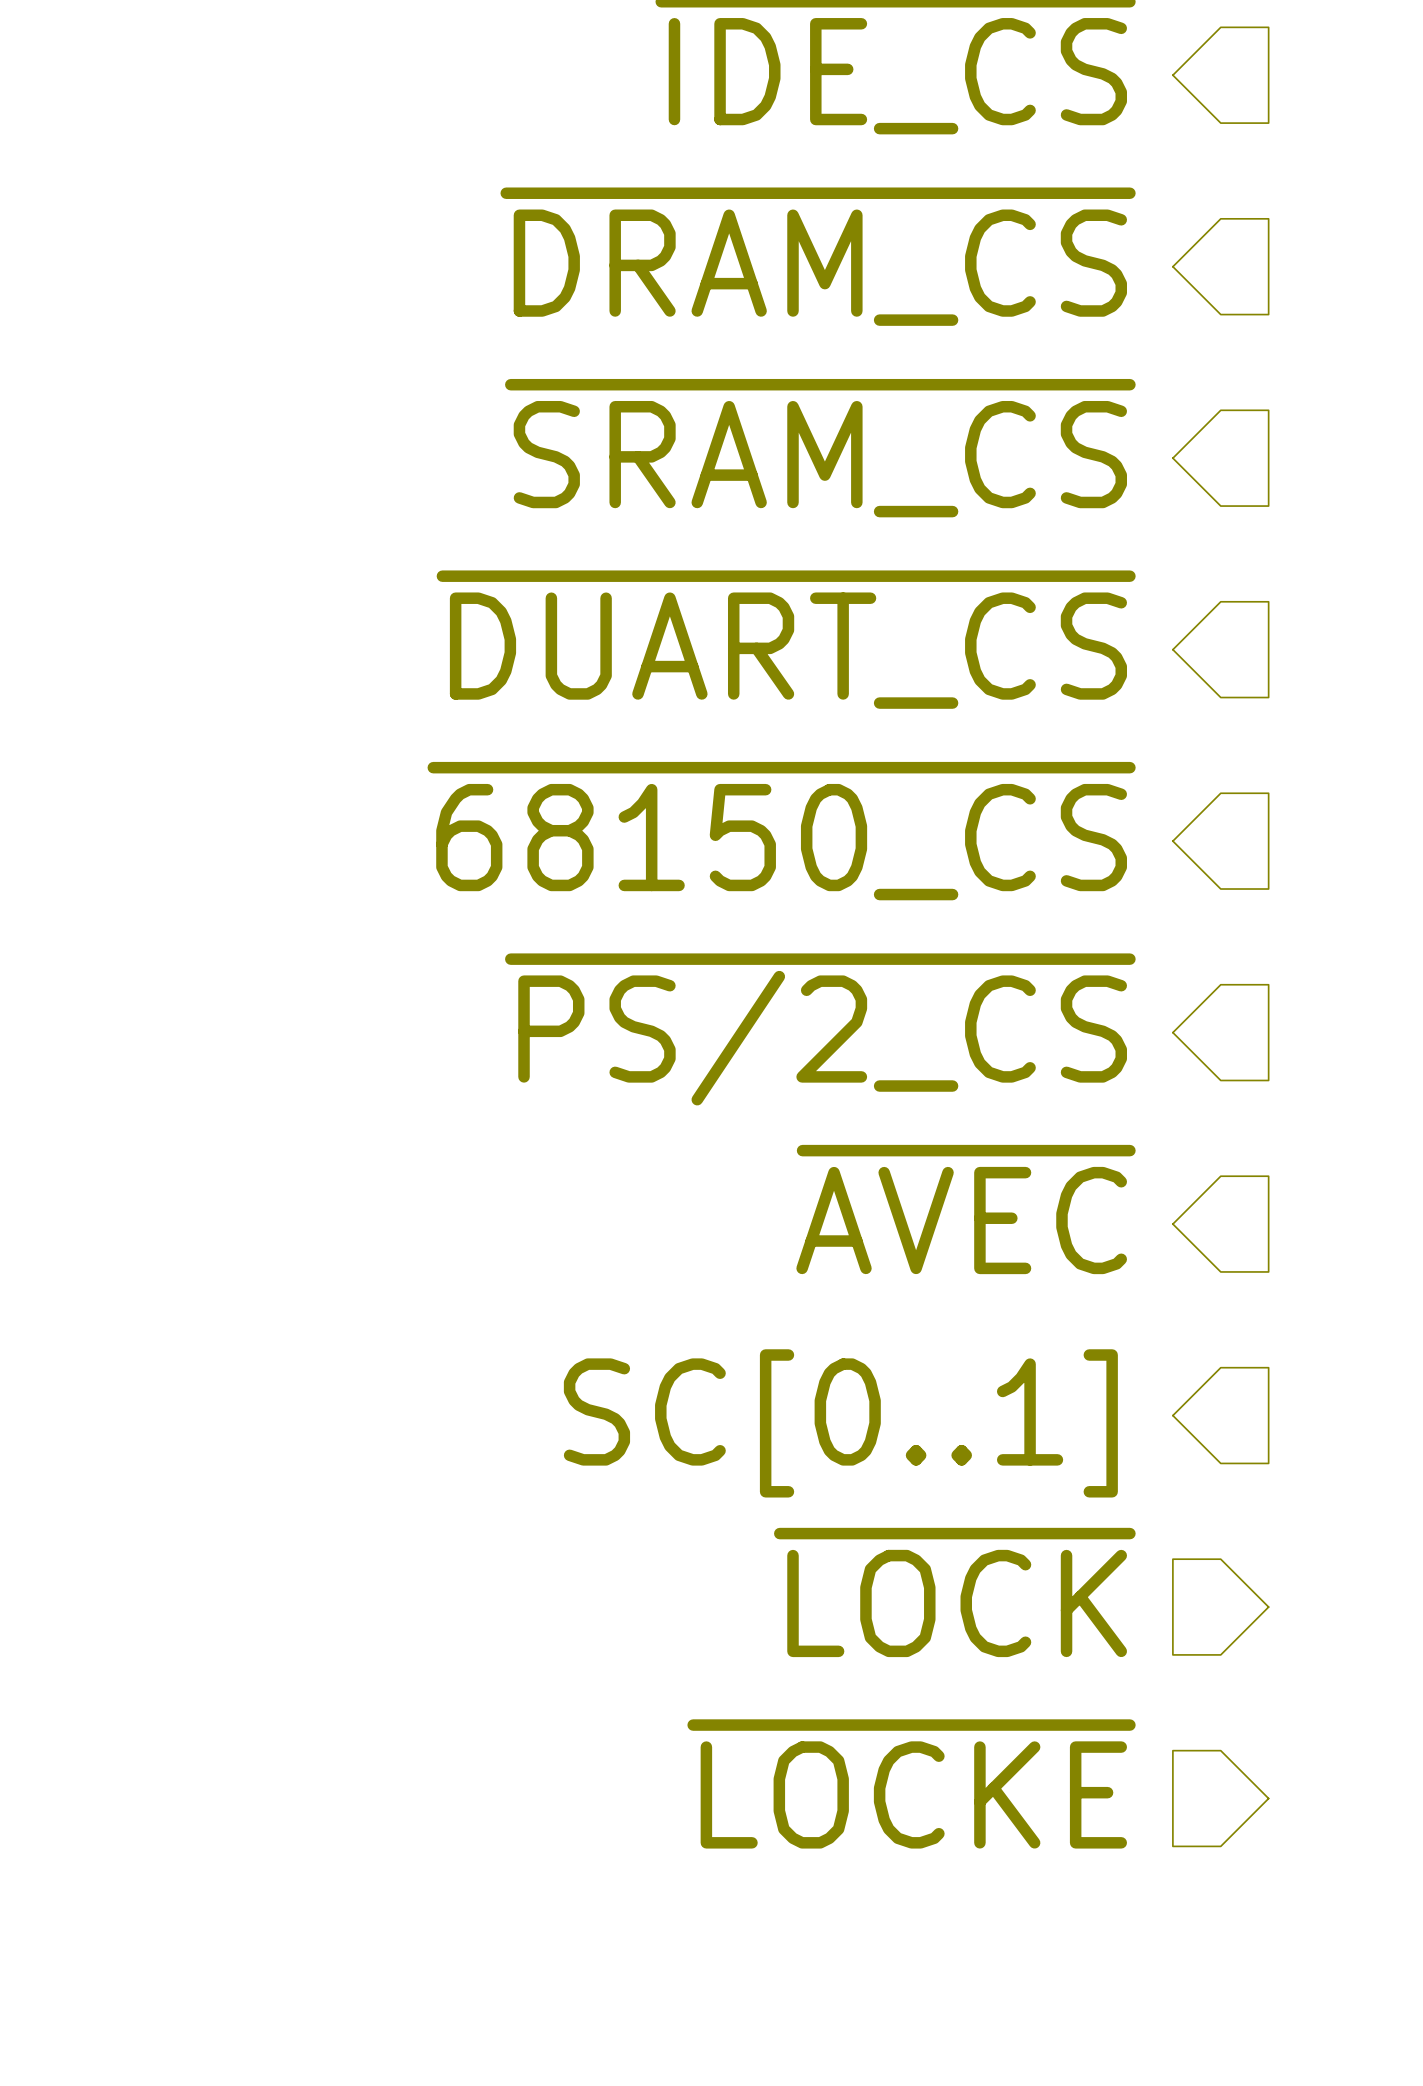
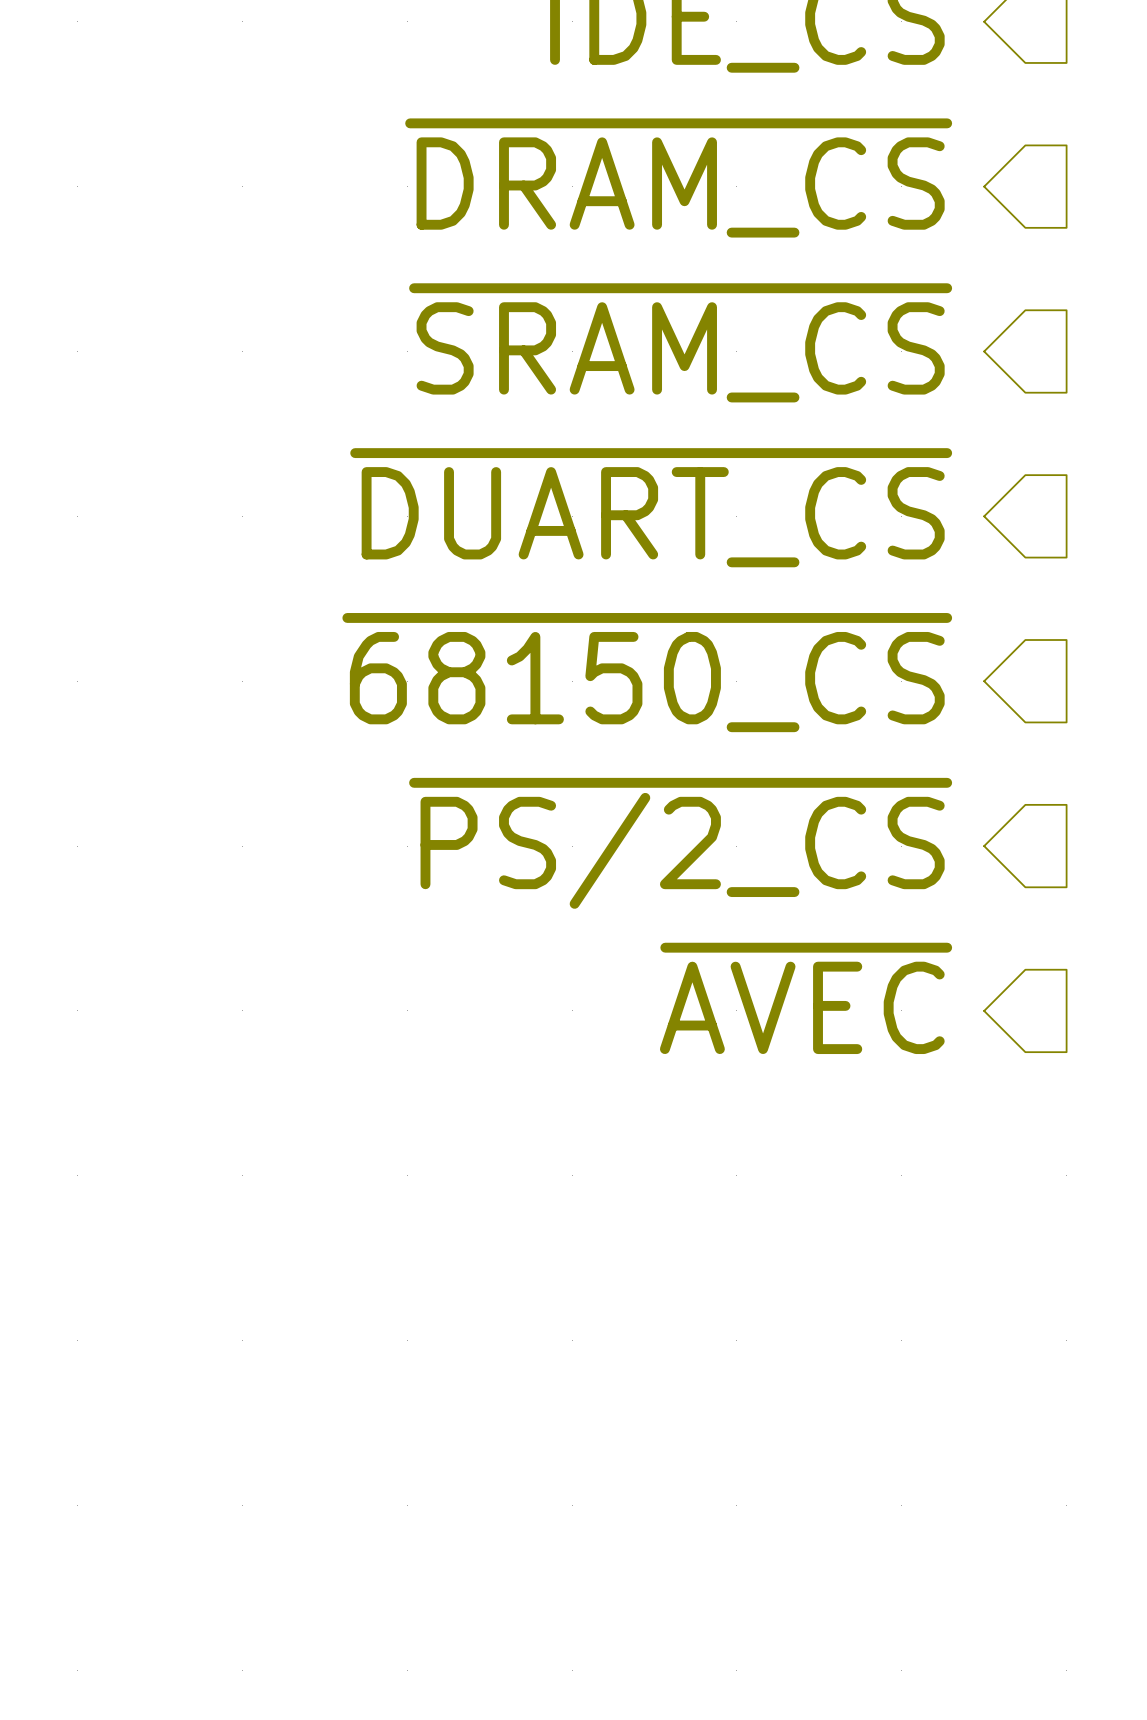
hierarchical label: SC[0..1] (840, 1423) -> none
hierarchical label: ~{LOCK} (954, 1592) -> none
hierarchical label: ~{LOCKE} (911, 1783) -> none

